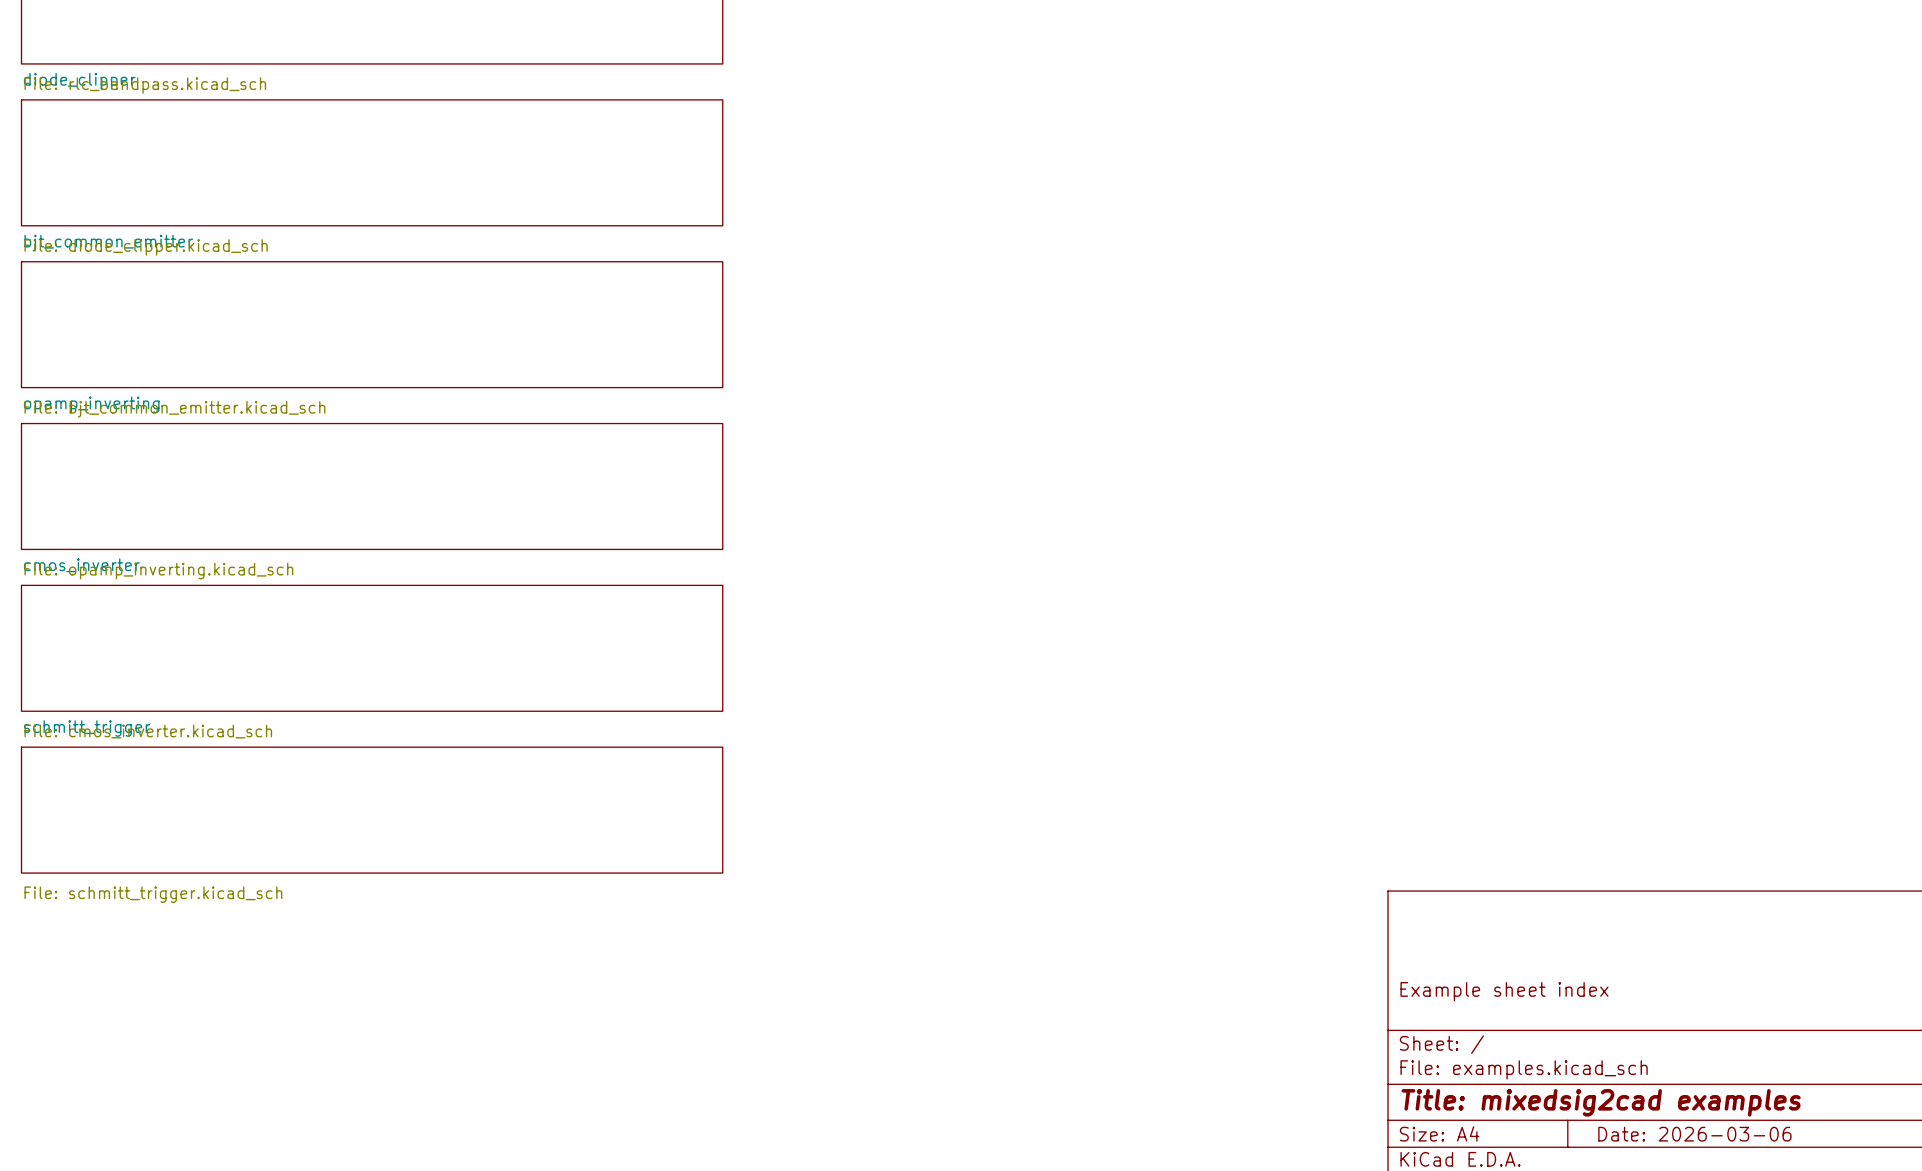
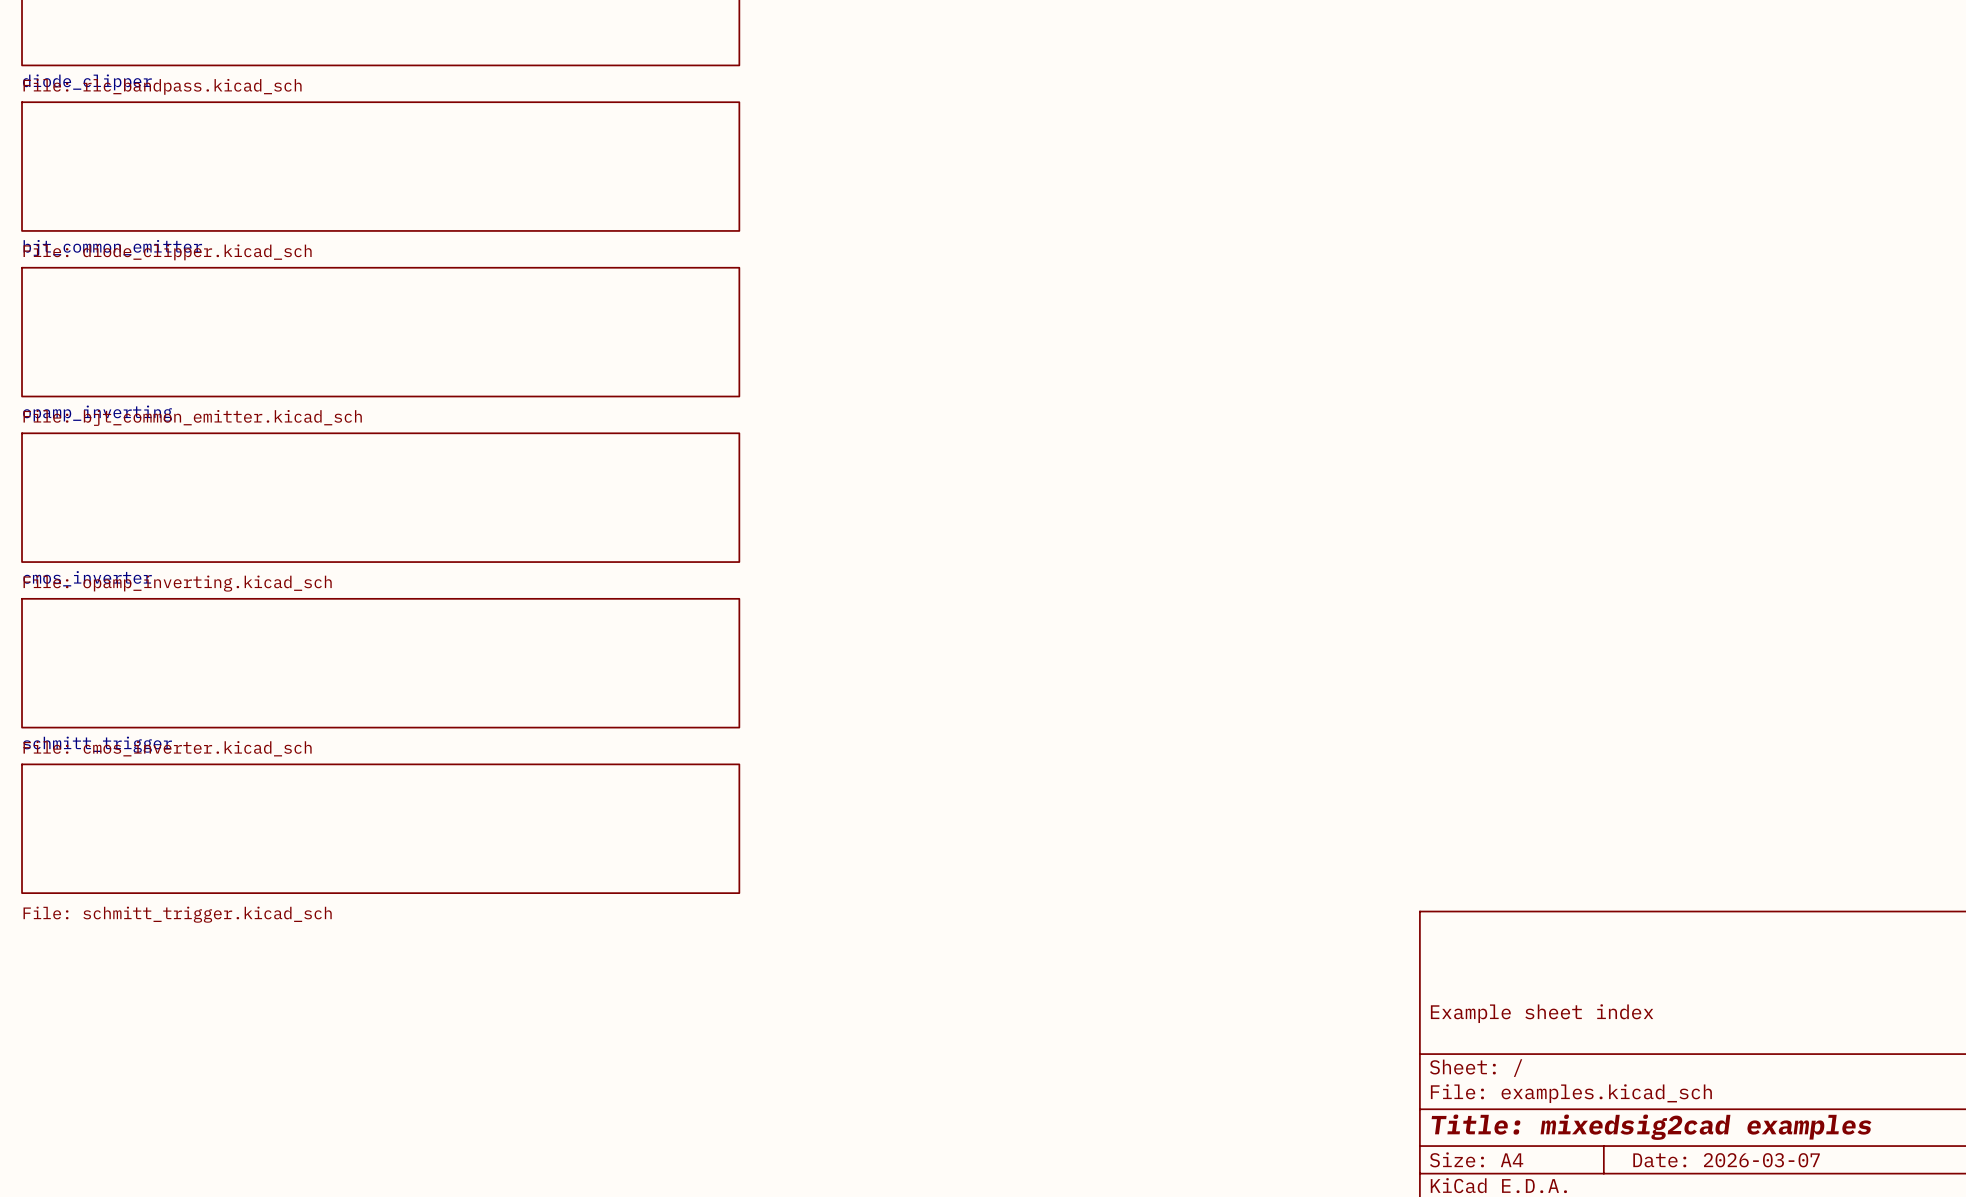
title block: Date: 2026-03-06 (1694, 1134) -> Date: 2026-03-07 (1726, 1160)

